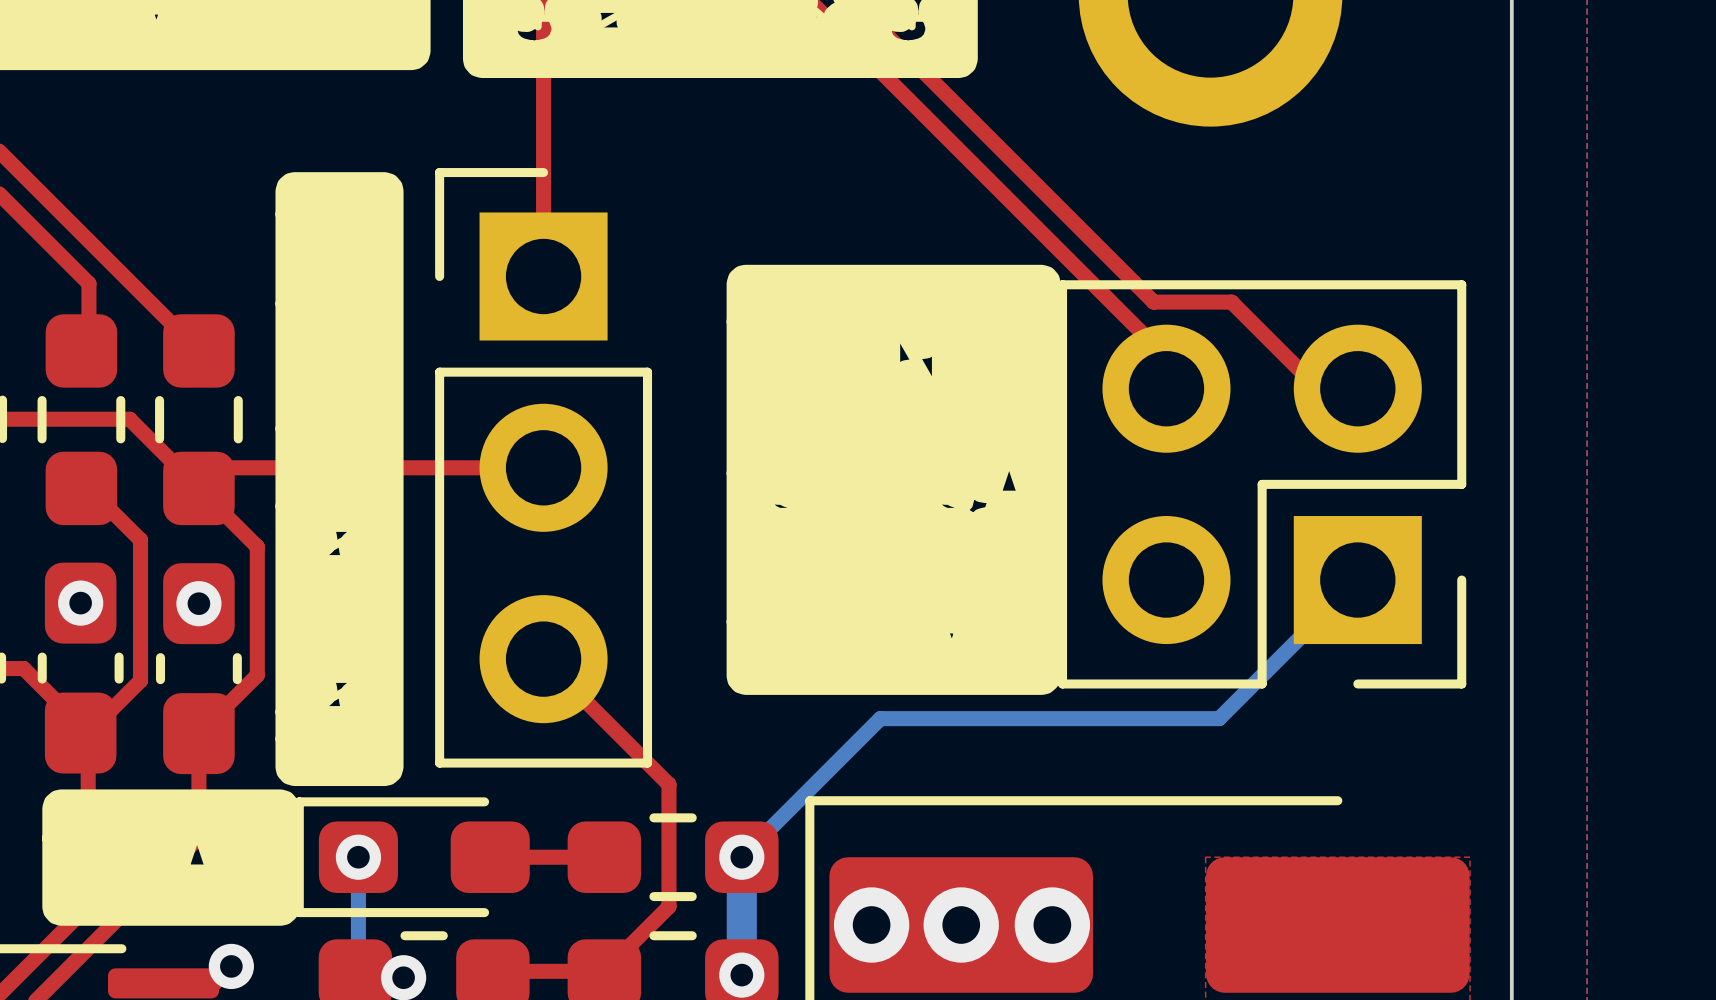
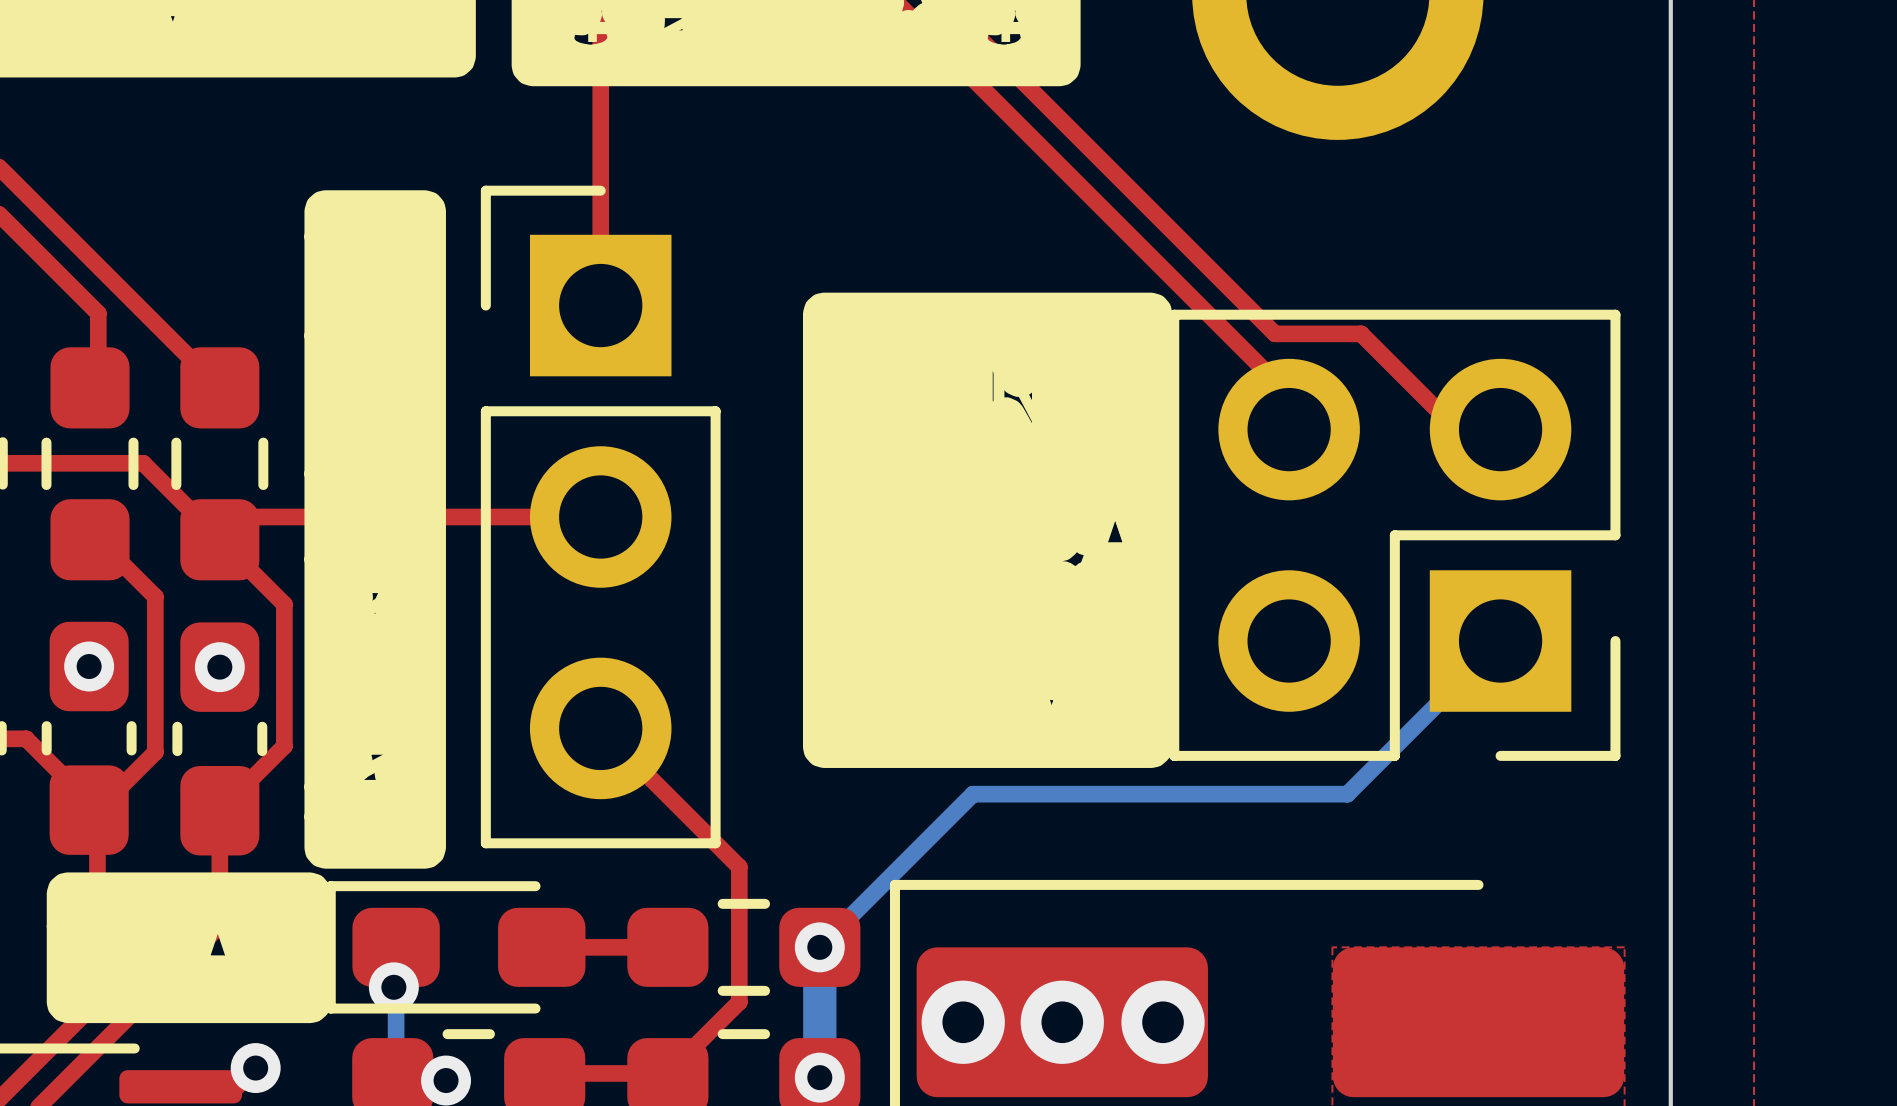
via position: (358, 857) -> (393, 987)

